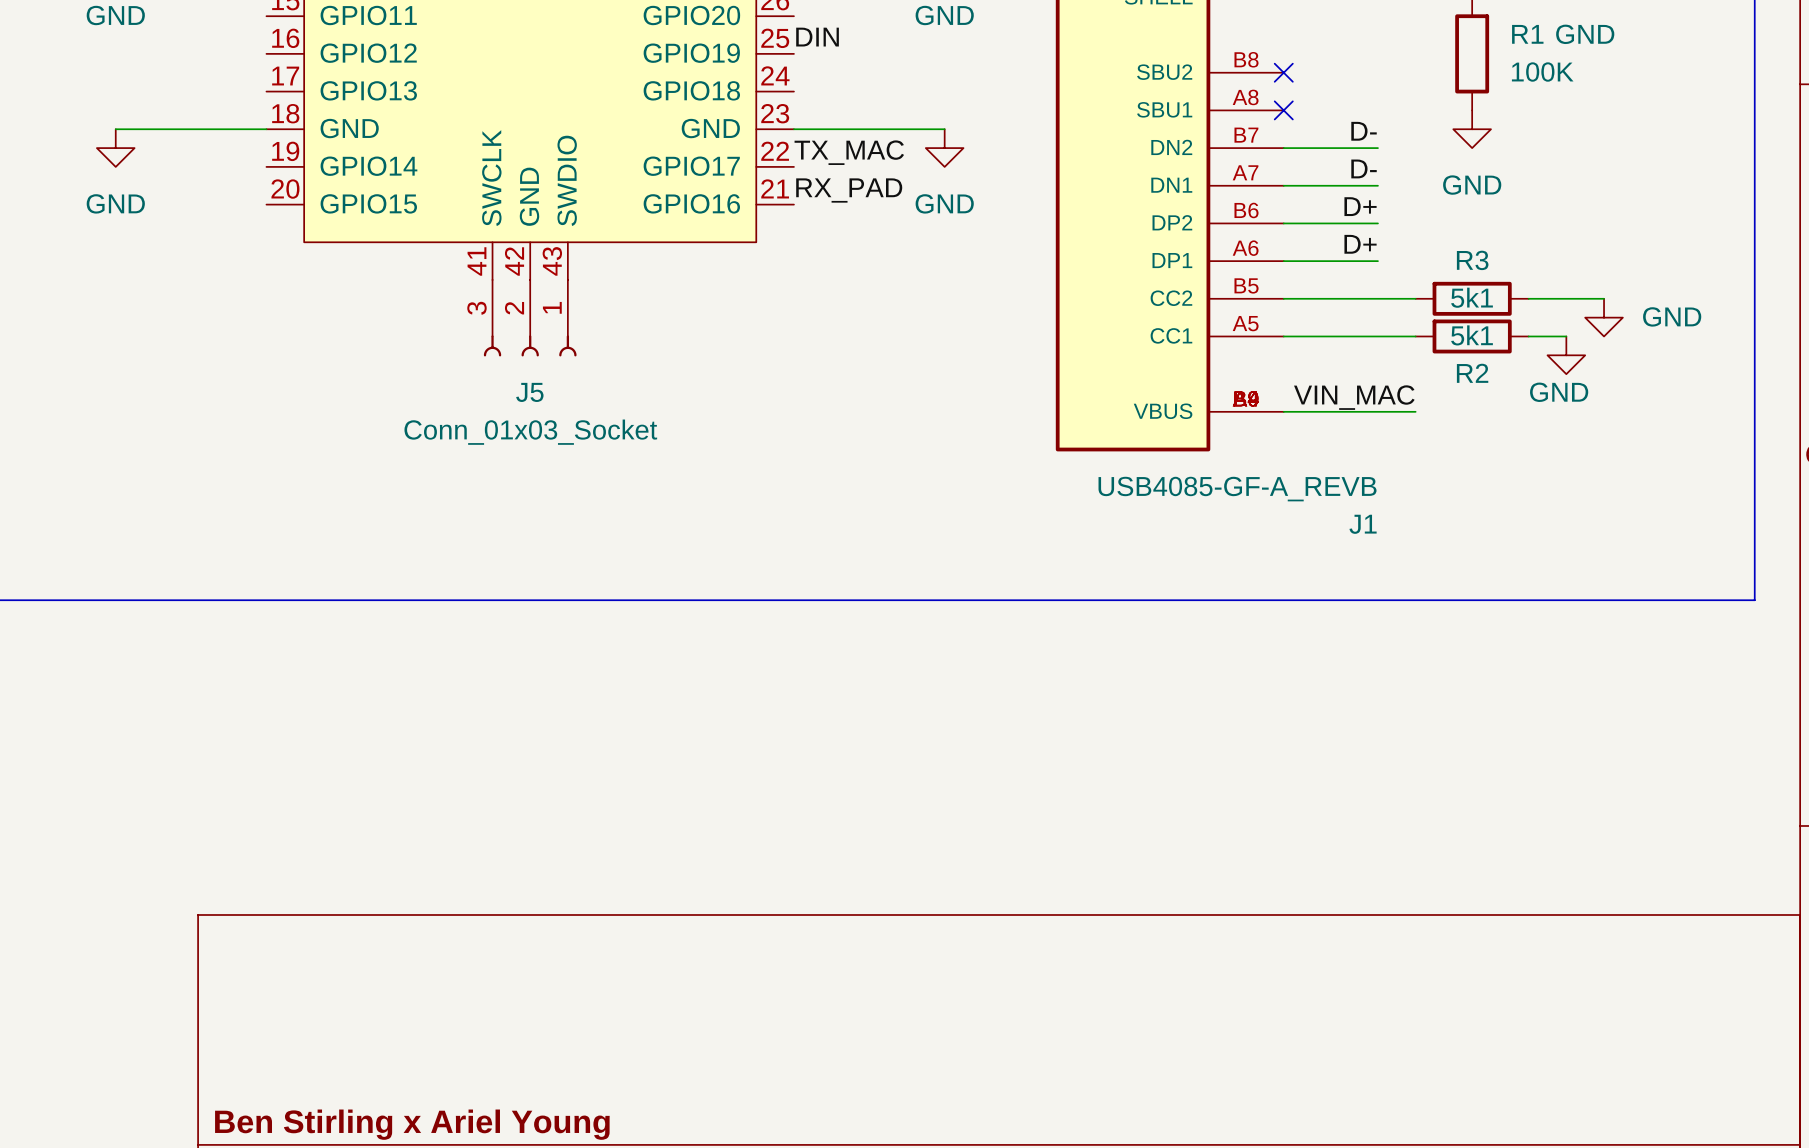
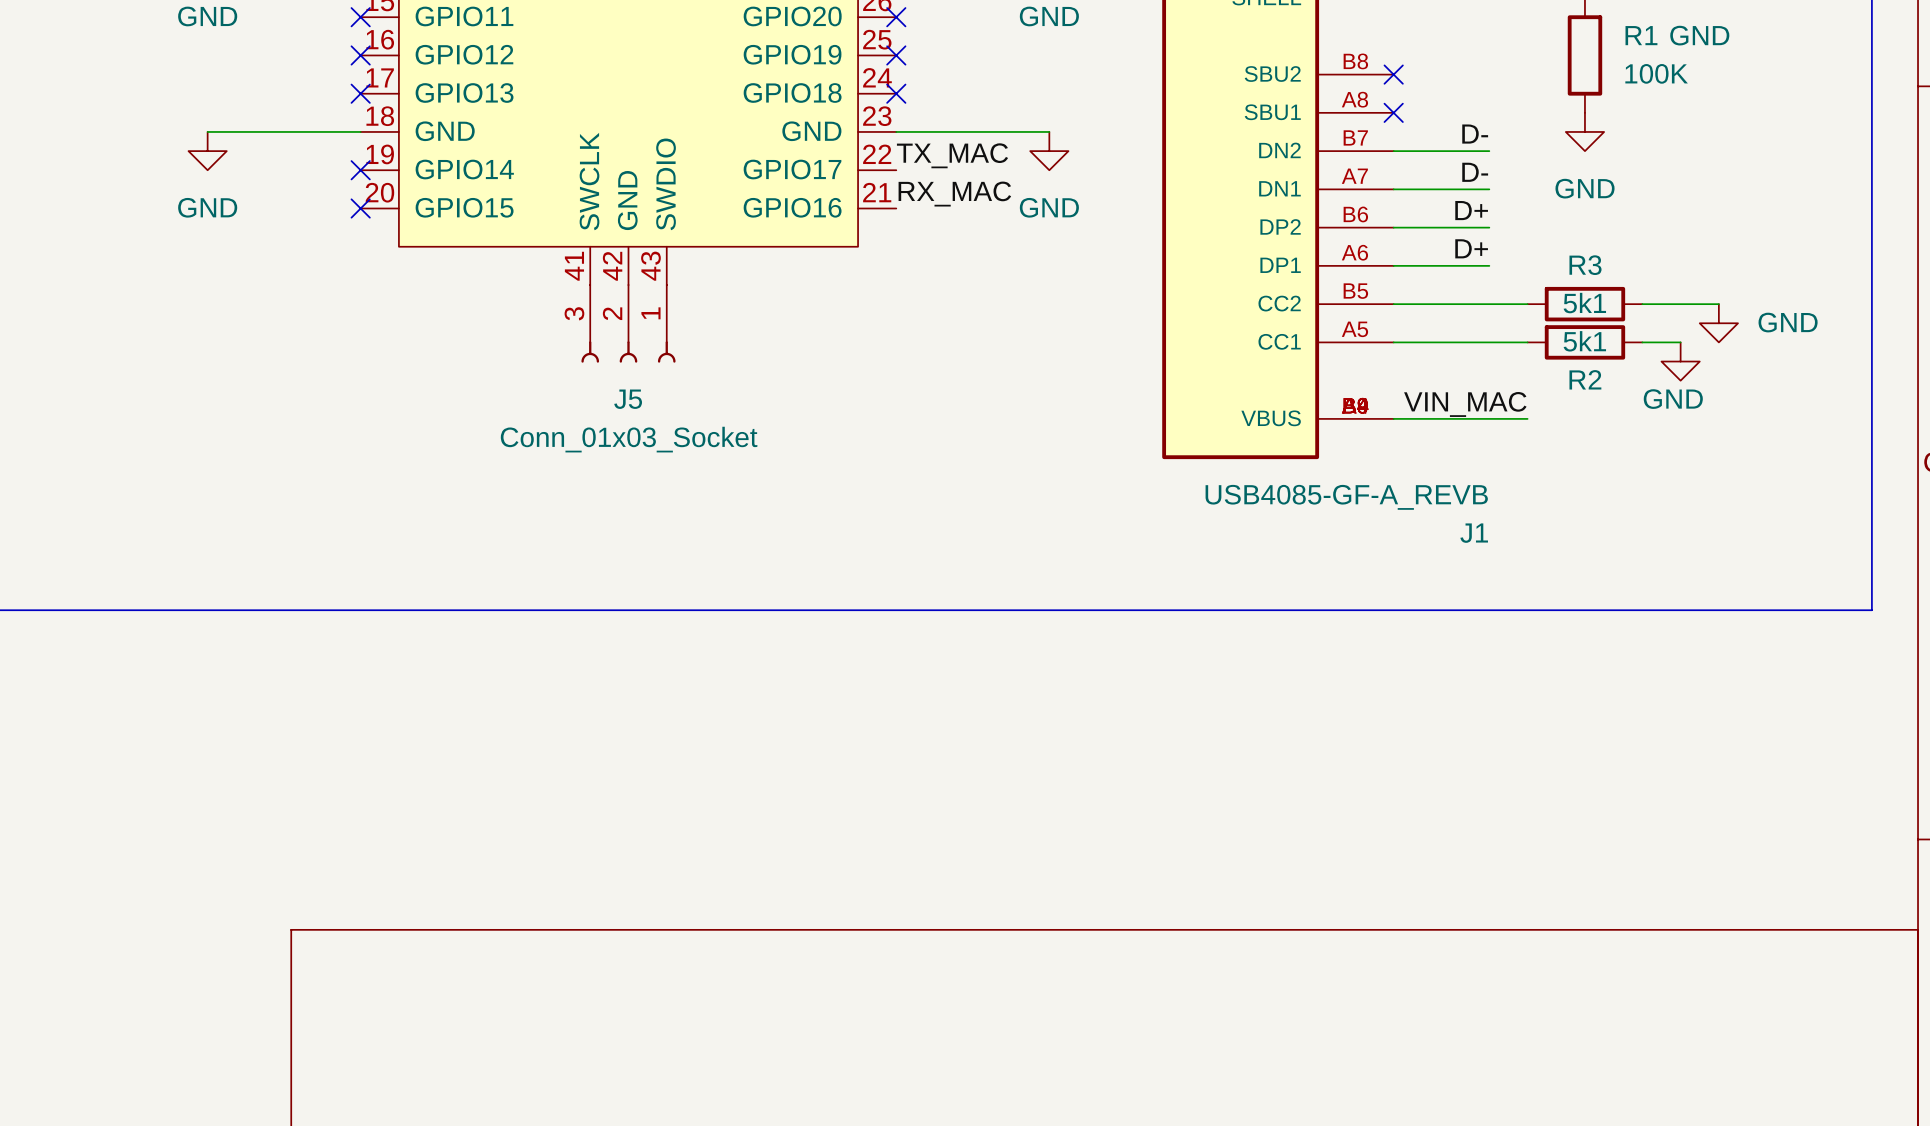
no-connect mark: none -> (360, 17)
no-connect mark: none -> (896, 17)
label: DIN (817, 37) -> none
no-connect mark: none -> (360, 55)
no-connect mark: none -> (896, 55)
no-connect mark: none -> (360, 93)
no-connect mark: none -> (896, 93)
no-connect mark: none -> (360, 170)
label: RX_PAD (849, 190) -> RX_MAC (954, 194)
no-connect mark: none -> (360, 208)

